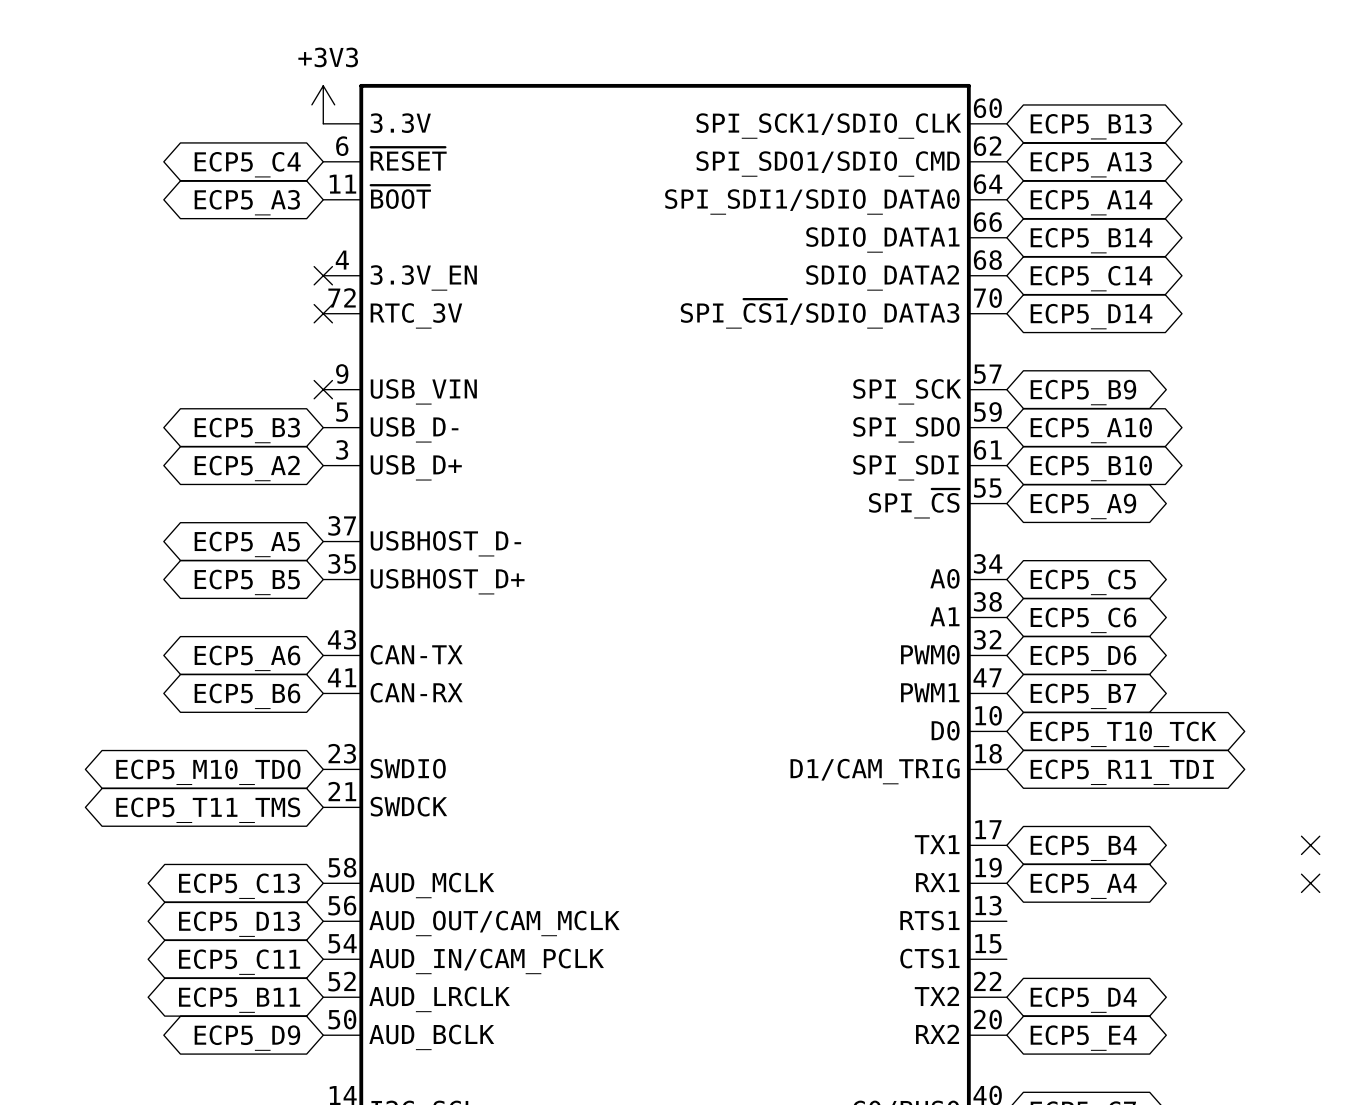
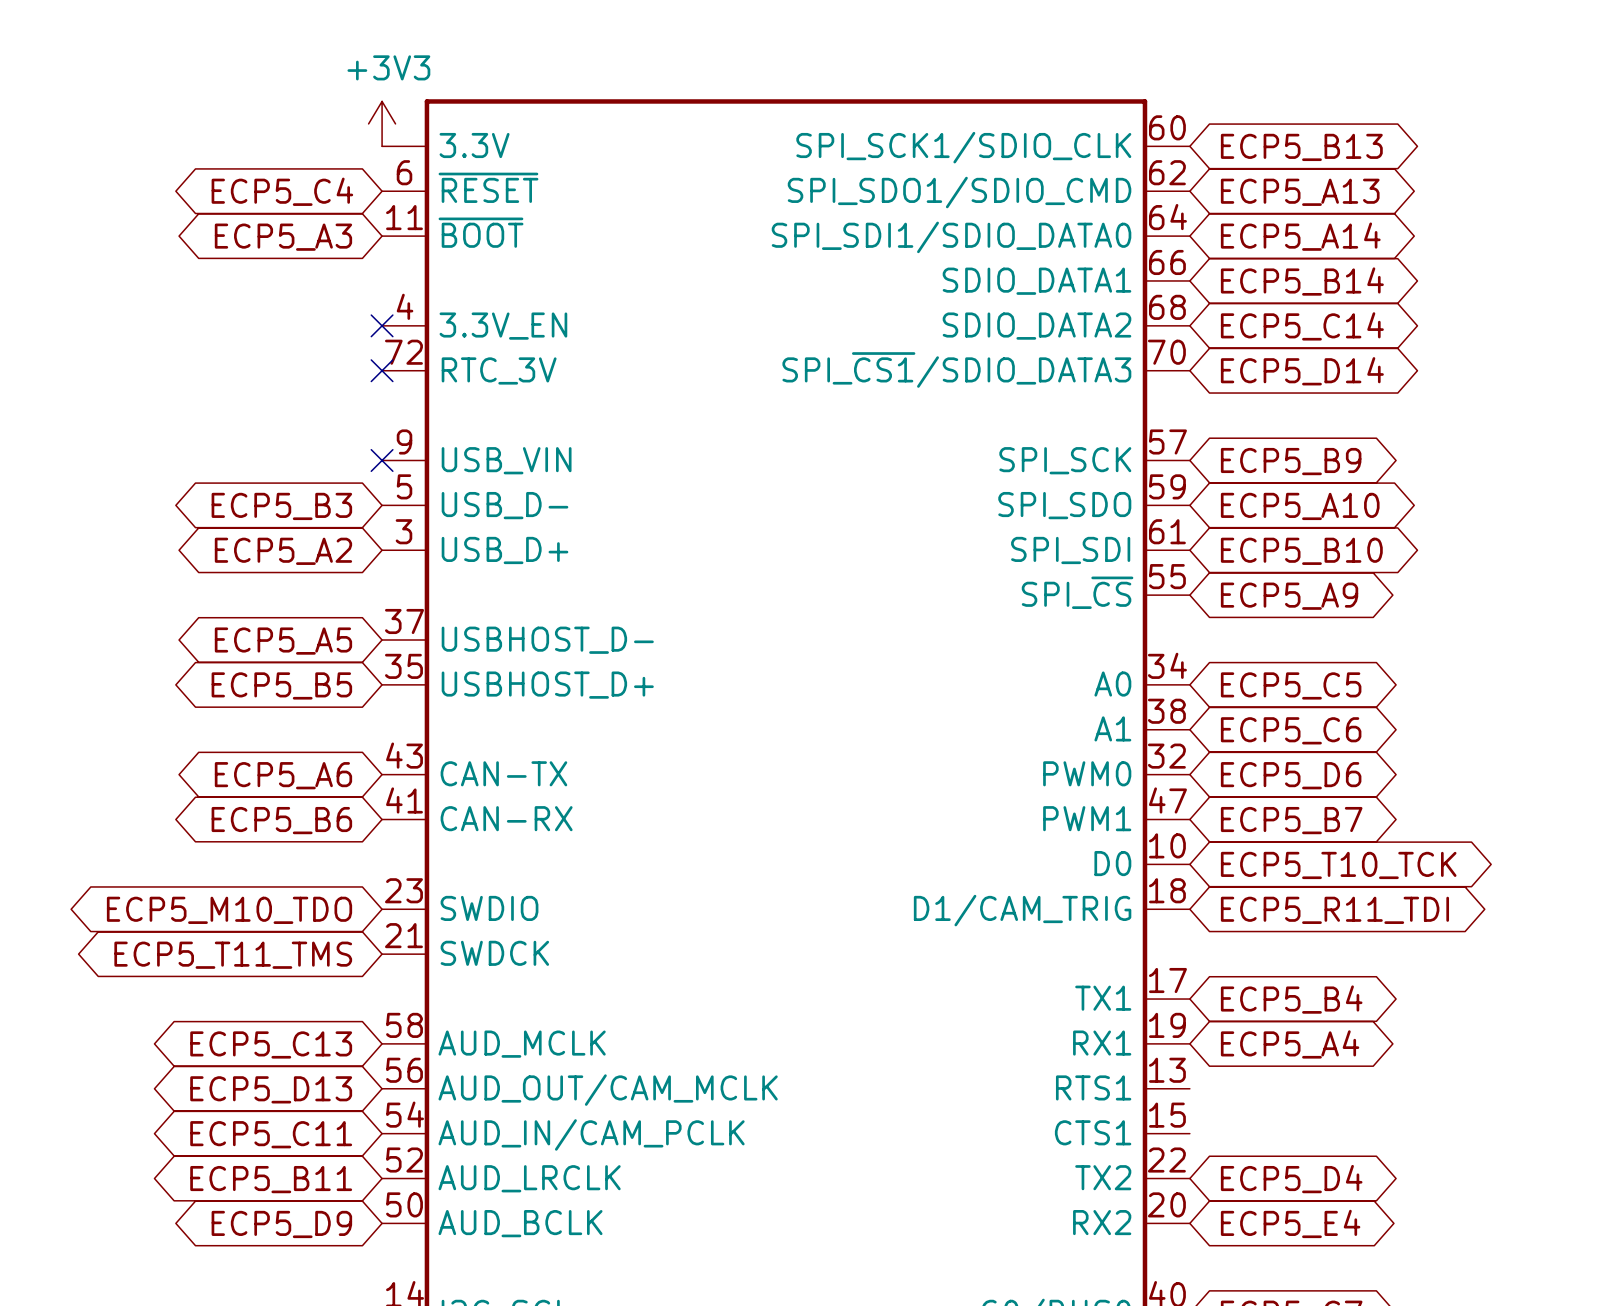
no-connect mark: (1310, 845) -> none
no-connect mark: (1310, 883) -> none

